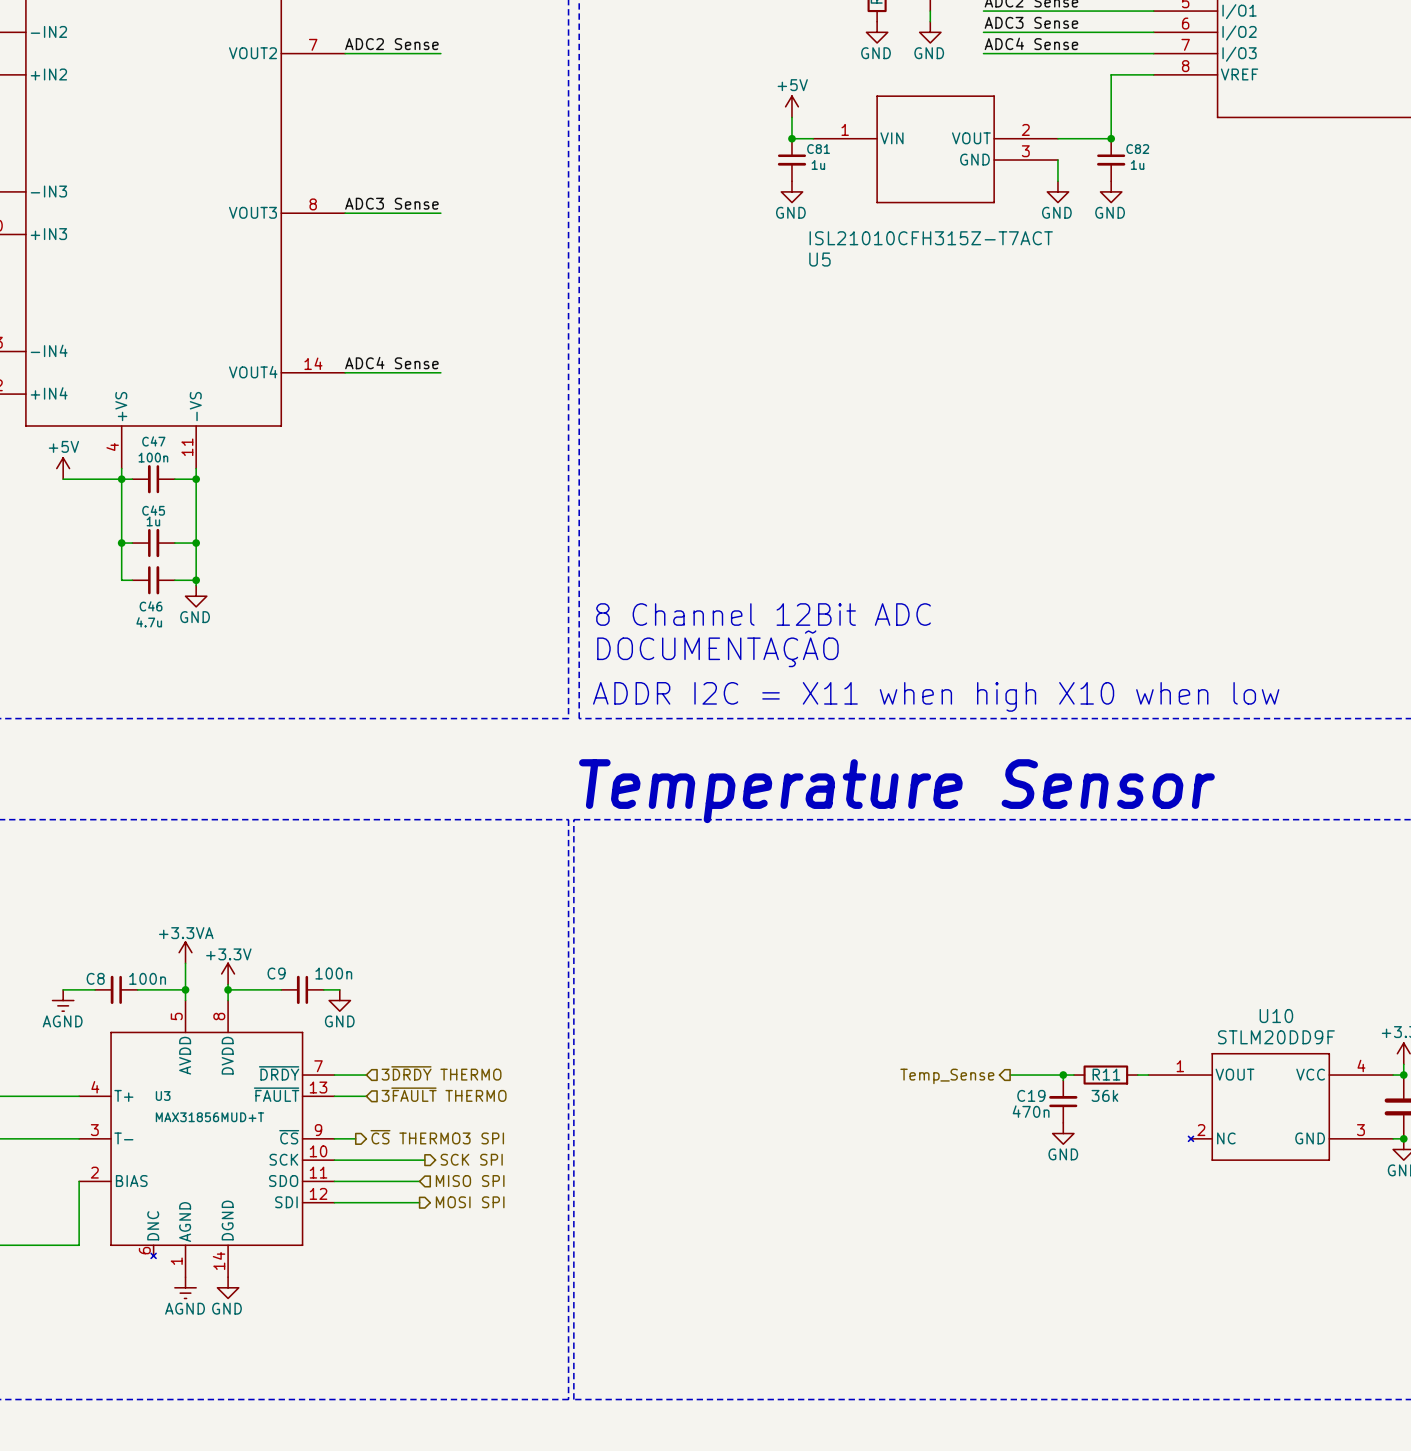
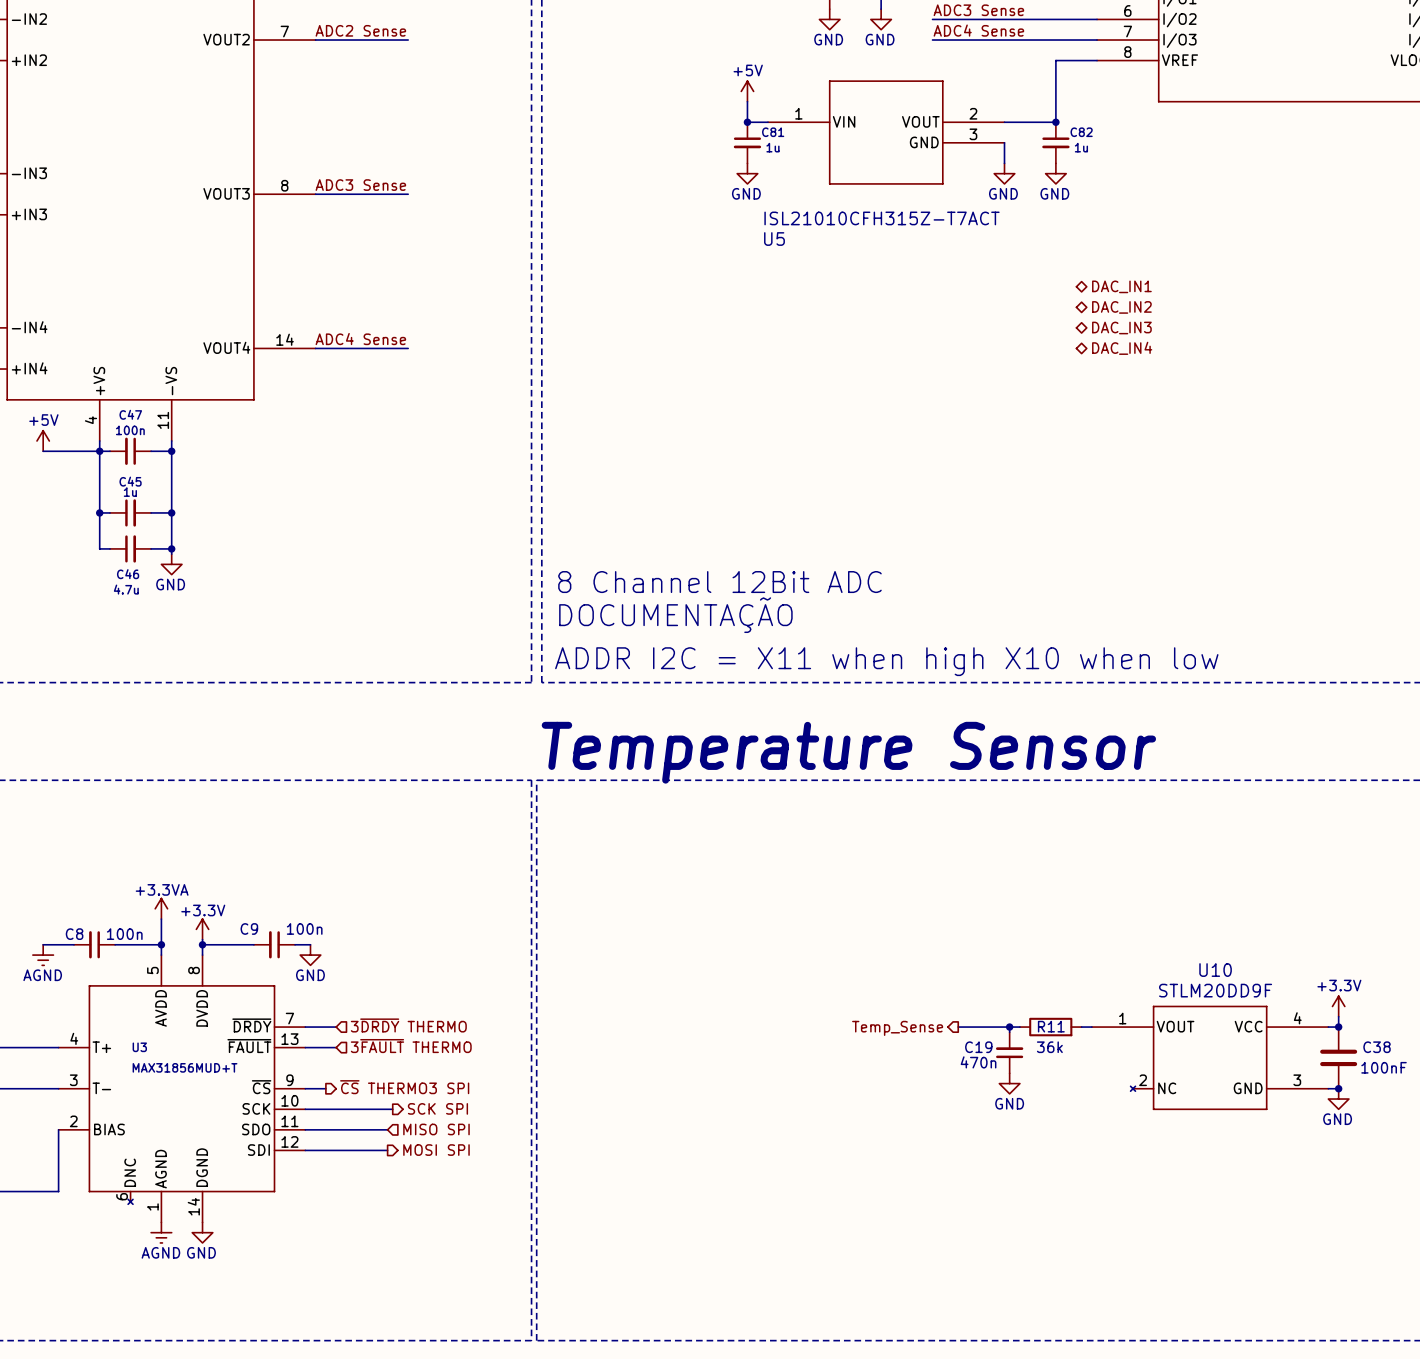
hierarchical label: none -> DAC_IN1 (1121, 286)
hierarchical label: none -> DAC_IN2 (1121, 307)
hierarchical label: none -> DAC_IN3 (1121, 328)
hierarchical label: none -> DAC_IN4 (1122, 348)

